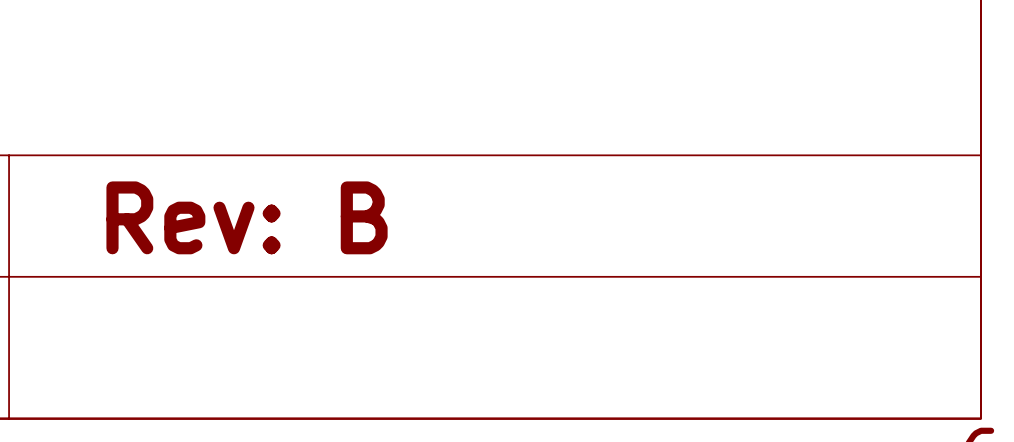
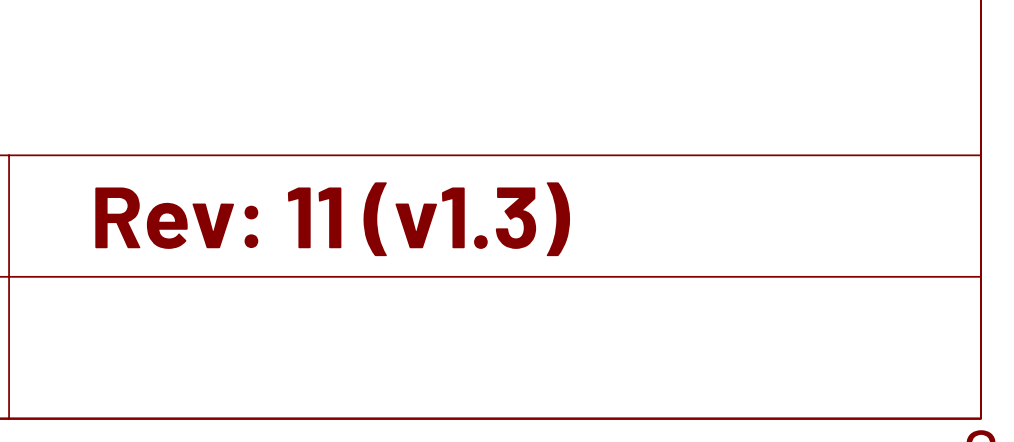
title block: Rev: B (247, 217) -> Rev: 11 (v1.3) (332, 219)

